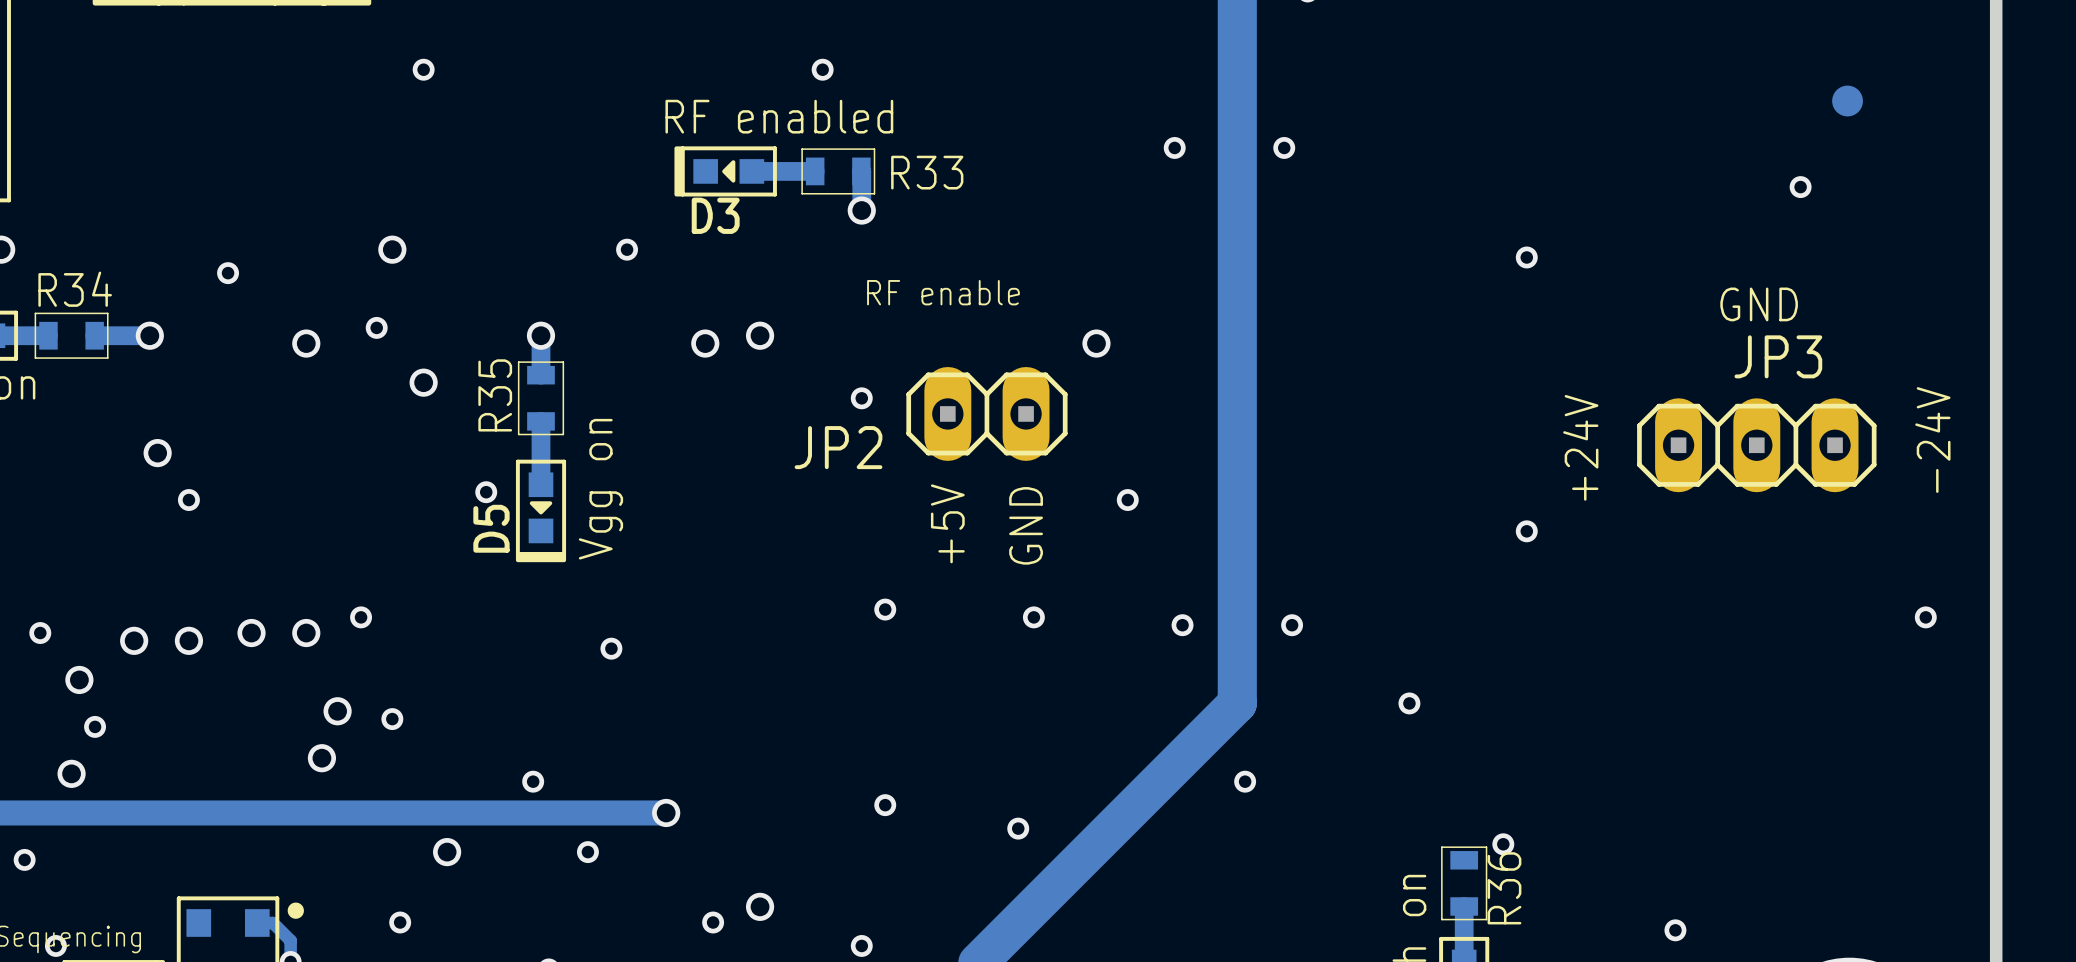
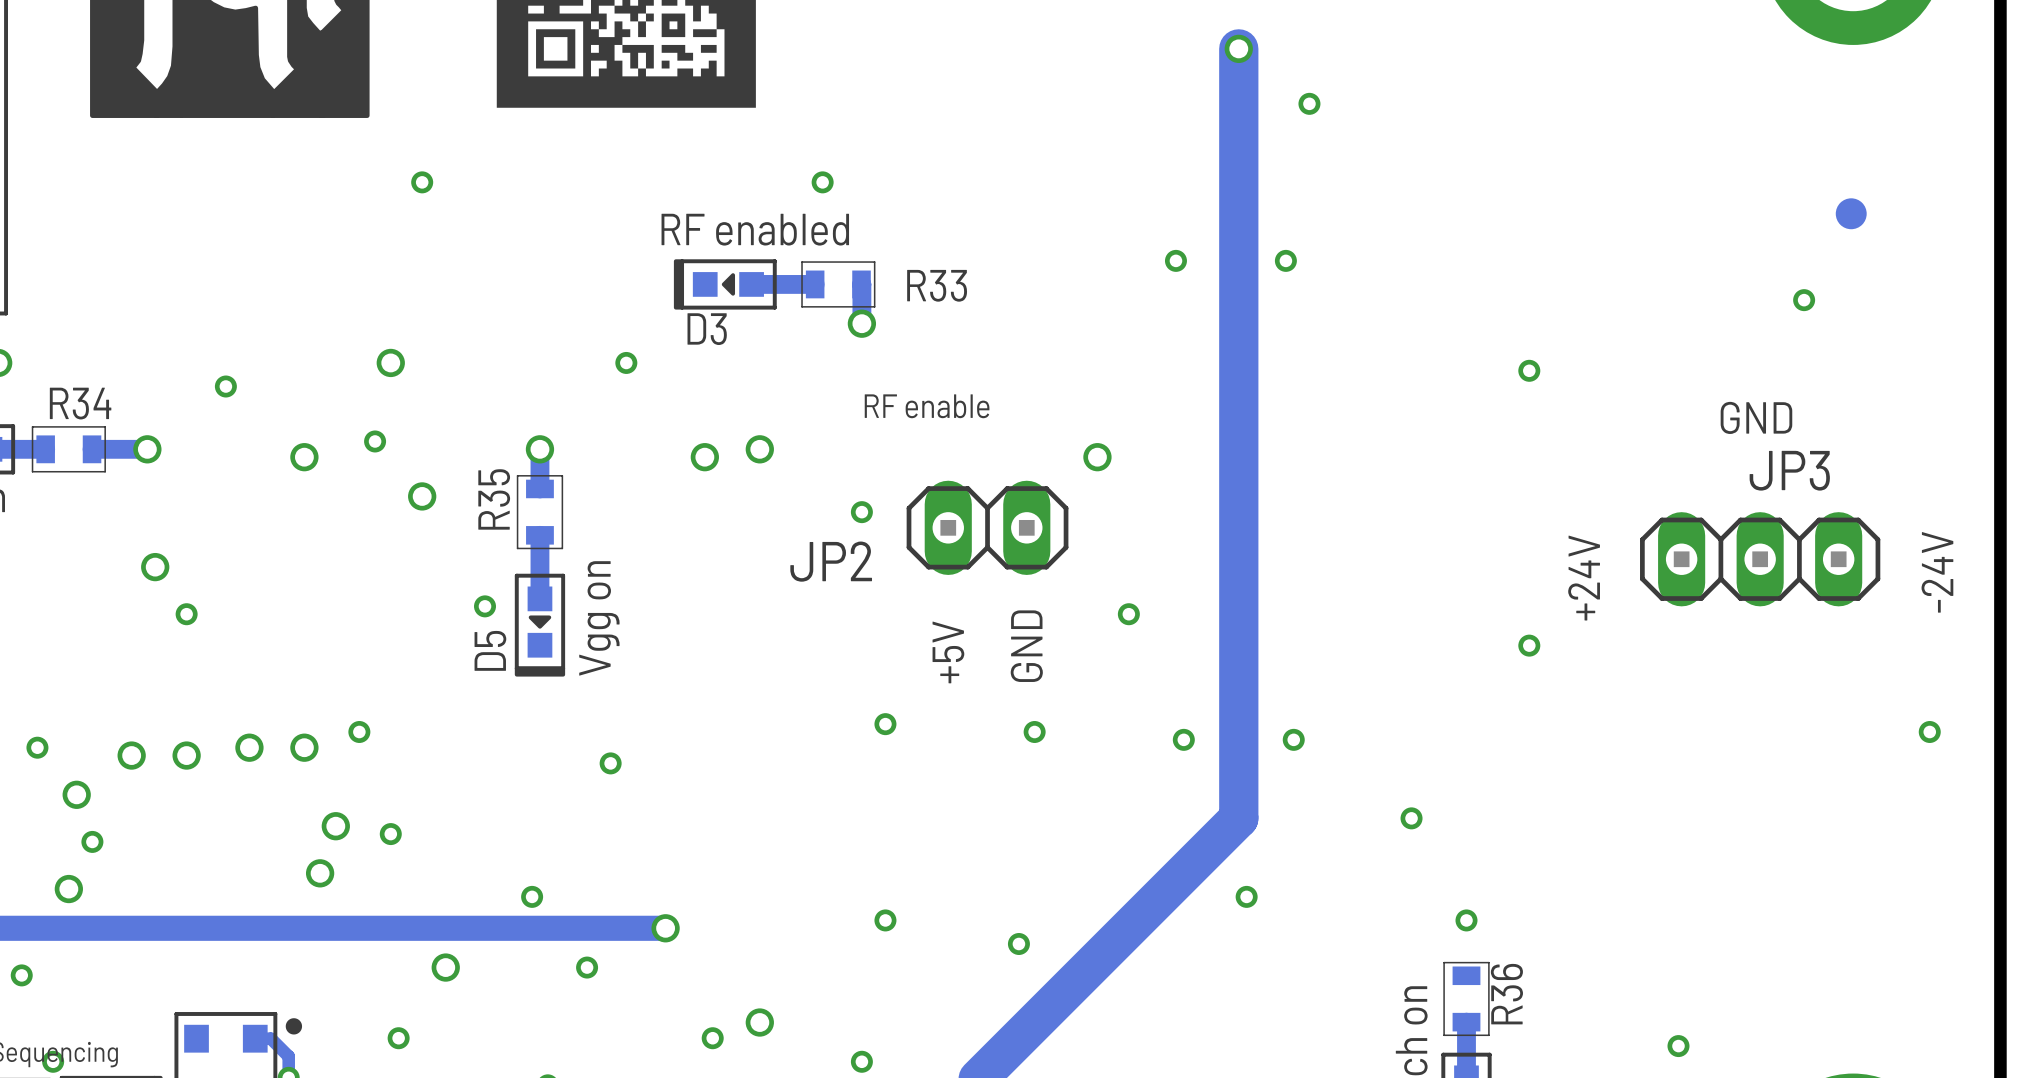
via position: (1503, 844) -> (1466, 920)

